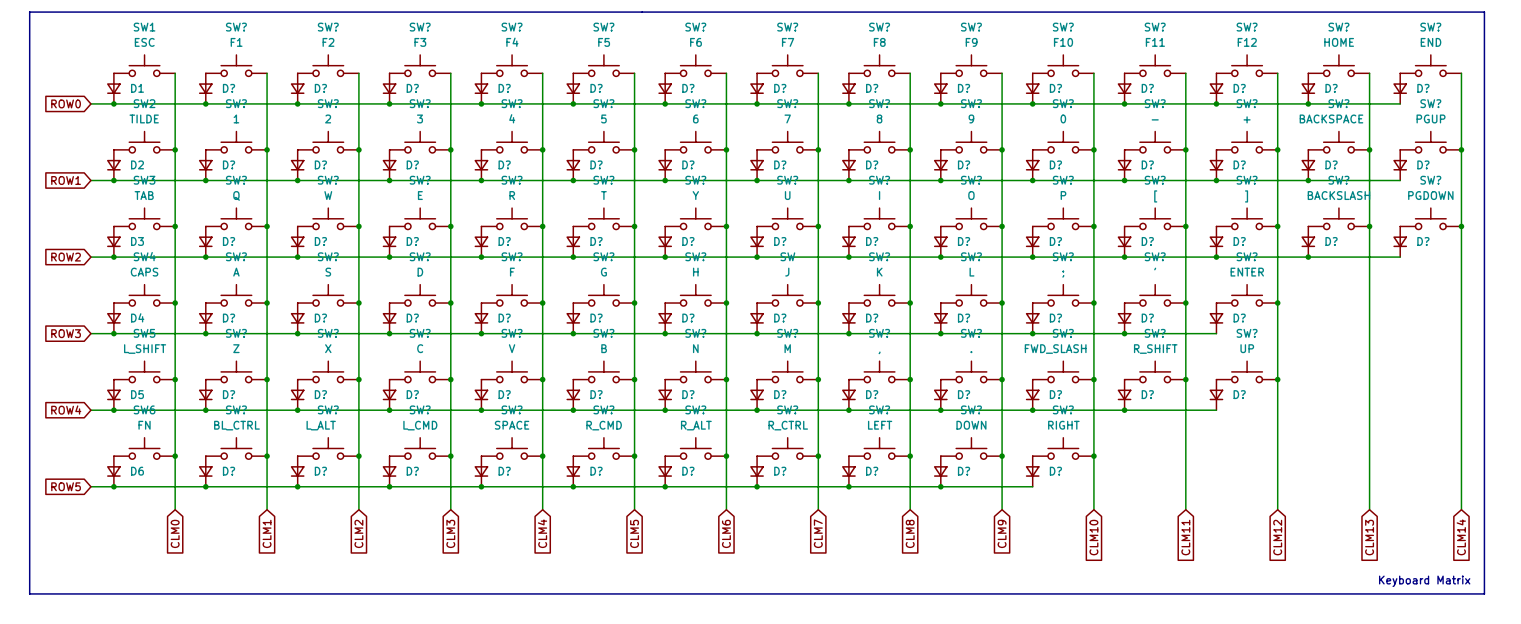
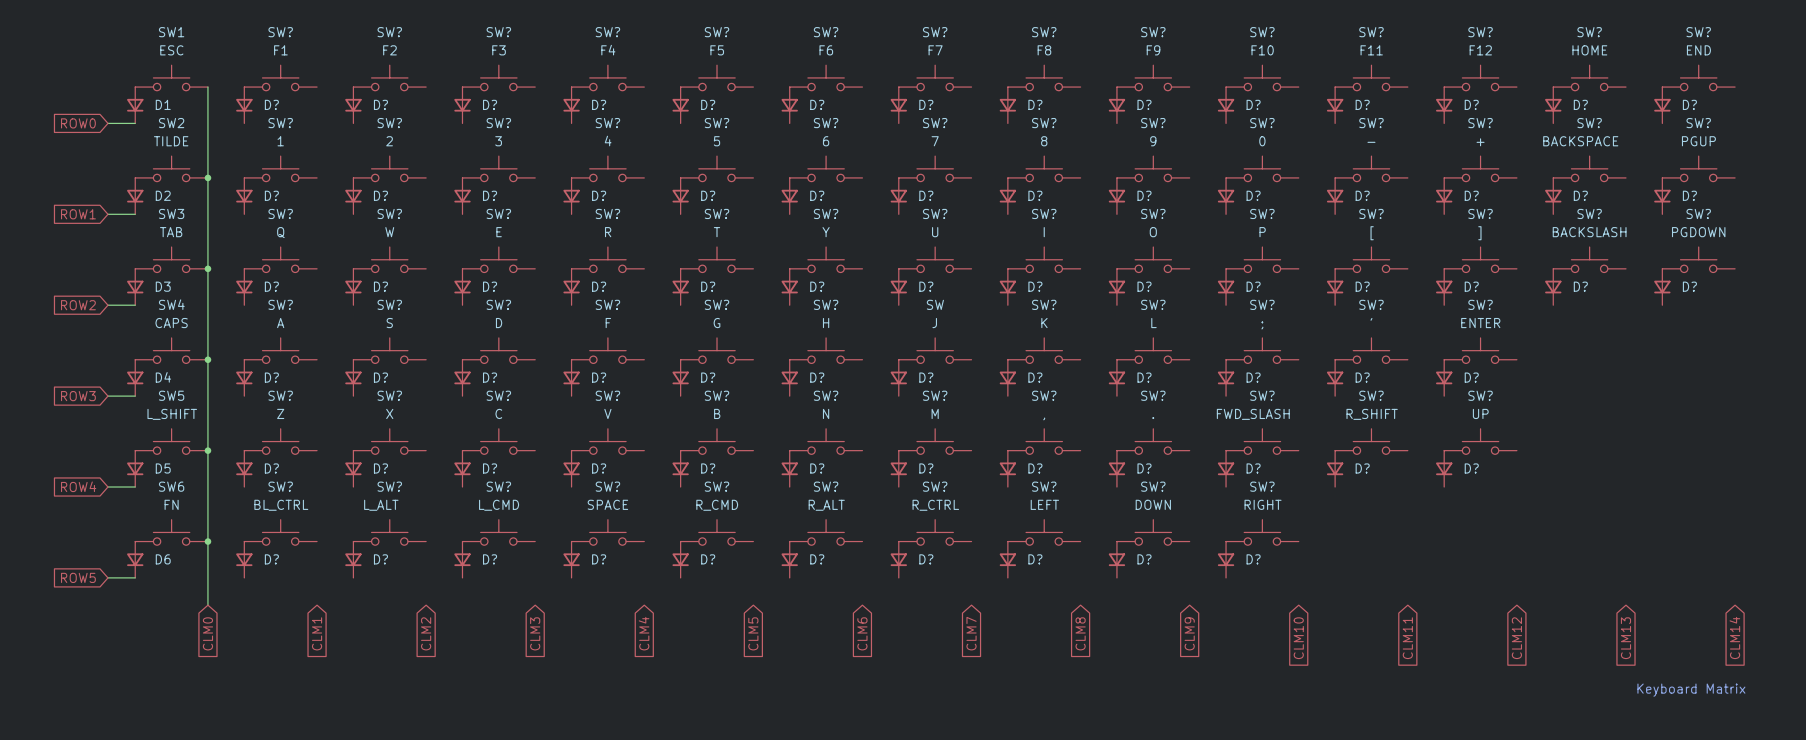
line: (29, 12) (29, 593) (1484, 593) (1484, 12) (29, 12) -> none
wire: (267, 73) (267, 509) -> none
wire: (358, 73) (358, 509) -> none
wire: (450, 73) (450, 509) -> none
wire: (542, 73) (542, 509) -> none
wire: (634, 73) (634, 509) -> none
wire: (726, 73) (726, 509) -> none
wire: (818, 73) (818, 509) -> none
wire: (910, 73) (910, 509) -> none
wire: (1002, 73) (1002, 509) -> none
wire: (1093, 73) (1093, 509) -> none
wire: (1185, 73) (1185, 509) -> none
wire: (1277, 73) (1277, 509) -> none
wire: (1369, 73) (1369, 509) -> none
wire: (1461, 73) (1461, 509) -> none
wire: (113, 103) (1400, 103) -> none
junction: (113, 103) -> none
junction: (205, 103) -> none
junction: (297, 103) -> none
junction: (389, 103) -> none
junction: (481, 103) -> none
junction: (573, 103) -> none
junction: (665, 103) -> none
junction: (757, 103) -> none
junction: (848, 103) -> none
junction: (940, 103) -> none
junction: (1032, 103) -> none
junction: (1124, 103) -> none
junction: (1216, 103) -> none
junction: (1308, 103) -> none
junction: (267, 149) -> none
junction: (358, 149) -> none
junction: (450, 149) -> none
junction: (542, 149) -> none
junction: (634, 149) -> none
junction: (726, 149) -> none
junction: (818, 149) -> none
junction: (910, 149) -> none
junction: (1002, 149) -> none
junction: (1093, 149) -> none
junction: (1185, 149) -> none
junction: (1277, 149) -> none
junction: (1369, 149) -> none
junction: (1461, 149) -> none
wire: (113, 180) (1400, 180) -> none
junction: (113, 180) -> none
junction: (205, 180) -> none
junction: (297, 180) -> none
junction: (389, 180) -> none
junction: (481, 180) -> none
junction: (573, 180) -> none
junction: (665, 180) -> none
junction: (757, 180) -> none
junction: (848, 180) -> none
junction: (940, 180) -> none
junction: (1032, 180) -> none
junction: (1124, 180) -> none
junction: (1216, 180) -> none
junction: (1308, 180) -> none
junction: (267, 226) -> none
junction: (358, 226) -> none
junction: (450, 226) -> none
junction: (542, 226) -> none
junction: (634, 226) -> none
junction: (726, 226) -> none
junction: (818, 226) -> none
junction: (910, 226) -> none
junction: (1002, 226) -> none
junction: (1093, 226) -> none
junction: (1185, 226) -> none
junction: (1277, 226) -> none
junction: (1369, 226) -> none
junction: (1461, 226) -> none
wire: (113, 257) (1400, 257) -> none
junction: (113, 257) -> none
junction: (205, 257) -> none
junction: (297, 257) -> none
junction: (389, 257) -> none
junction: (481, 257) -> none
junction: (573, 257) -> none
junction: (665, 257) -> none
junction: (757, 257) -> none
junction: (848, 257) -> none
junction: (940, 257) -> none
junction: (1032, 257) -> none
junction: (1124, 257) -> none
junction: (1216, 257) -> none
junction: (1308, 257) -> none
junction: (267, 303) -> none
junction: (358, 303) -> none
junction: (450, 303) -> none
junction: (542, 303) -> none
junction: (634, 303) -> none
junction: (726, 303) -> none
junction: (818, 303) -> none
junction: (910, 303) -> none
junction: (1002, 303) -> none
junction: (1093, 303) -> none
junction: (1185, 303) -> none
junction: (1277, 303) -> none
wire: (113, 333) (1216, 333) -> none
junction: (113, 333) -> none
junction: (205, 333) -> none
junction: (297, 333) -> none
junction: (389, 333) -> none
junction: (481, 333) -> none
junction: (573, 333) -> none
junction: (665, 333) -> none
junction: (757, 333) -> none
junction: (848, 333) -> none
junction: (940, 333) -> none
junction: (1032, 333) -> none
junction: (1124, 333) -> none
junction: (267, 379) -> none
junction: (358, 379) -> none
junction: (450, 379) -> none
junction: (542, 379) -> none
junction: (634, 379) -> none
junction: (726, 379) -> none
junction: (818, 379) -> none
junction: (910, 379) -> none
junction: (1002, 379) -> none
junction: (1093, 379) -> none
junction: (1185, 379) -> none
junction: (1277, 379) -> none
wire: (113, 410) (1216, 410) -> none
junction: (113, 410) -> none
junction: (205, 410) -> none
junction: (297, 410) -> none
junction: (389, 410) -> none
junction: (481, 410) -> none
junction: (573, 410) -> none
junction: (665, 410) -> none
junction: (757, 410) -> none
junction: (848, 410) -> none
junction: (940, 410) -> none
junction: (1032, 410) -> none
junction: (1124, 410) -> none
junction: (267, 456) -> none
junction: (358, 456) -> none
junction: (450, 456) -> none
junction: (542, 456) -> none
junction: (634, 456) -> none
junction: (726, 456) -> none
junction: (818, 456) -> none
junction: (910, 456) -> none
junction: (1002, 456) -> none
junction: (1093, 456) -> none
wire: (113, 486) (1032, 486) -> none
junction: (113, 486) -> none
junction: (205, 486) -> none
junction: (297, 486) -> none
junction: (389, 486) -> none
junction: (481, 486) -> none
junction: (573, 486) -> none
junction: (665, 486) -> none
junction: (757, 486) -> none
junction: (848, 486) -> none
junction: (940, 486) -> none

